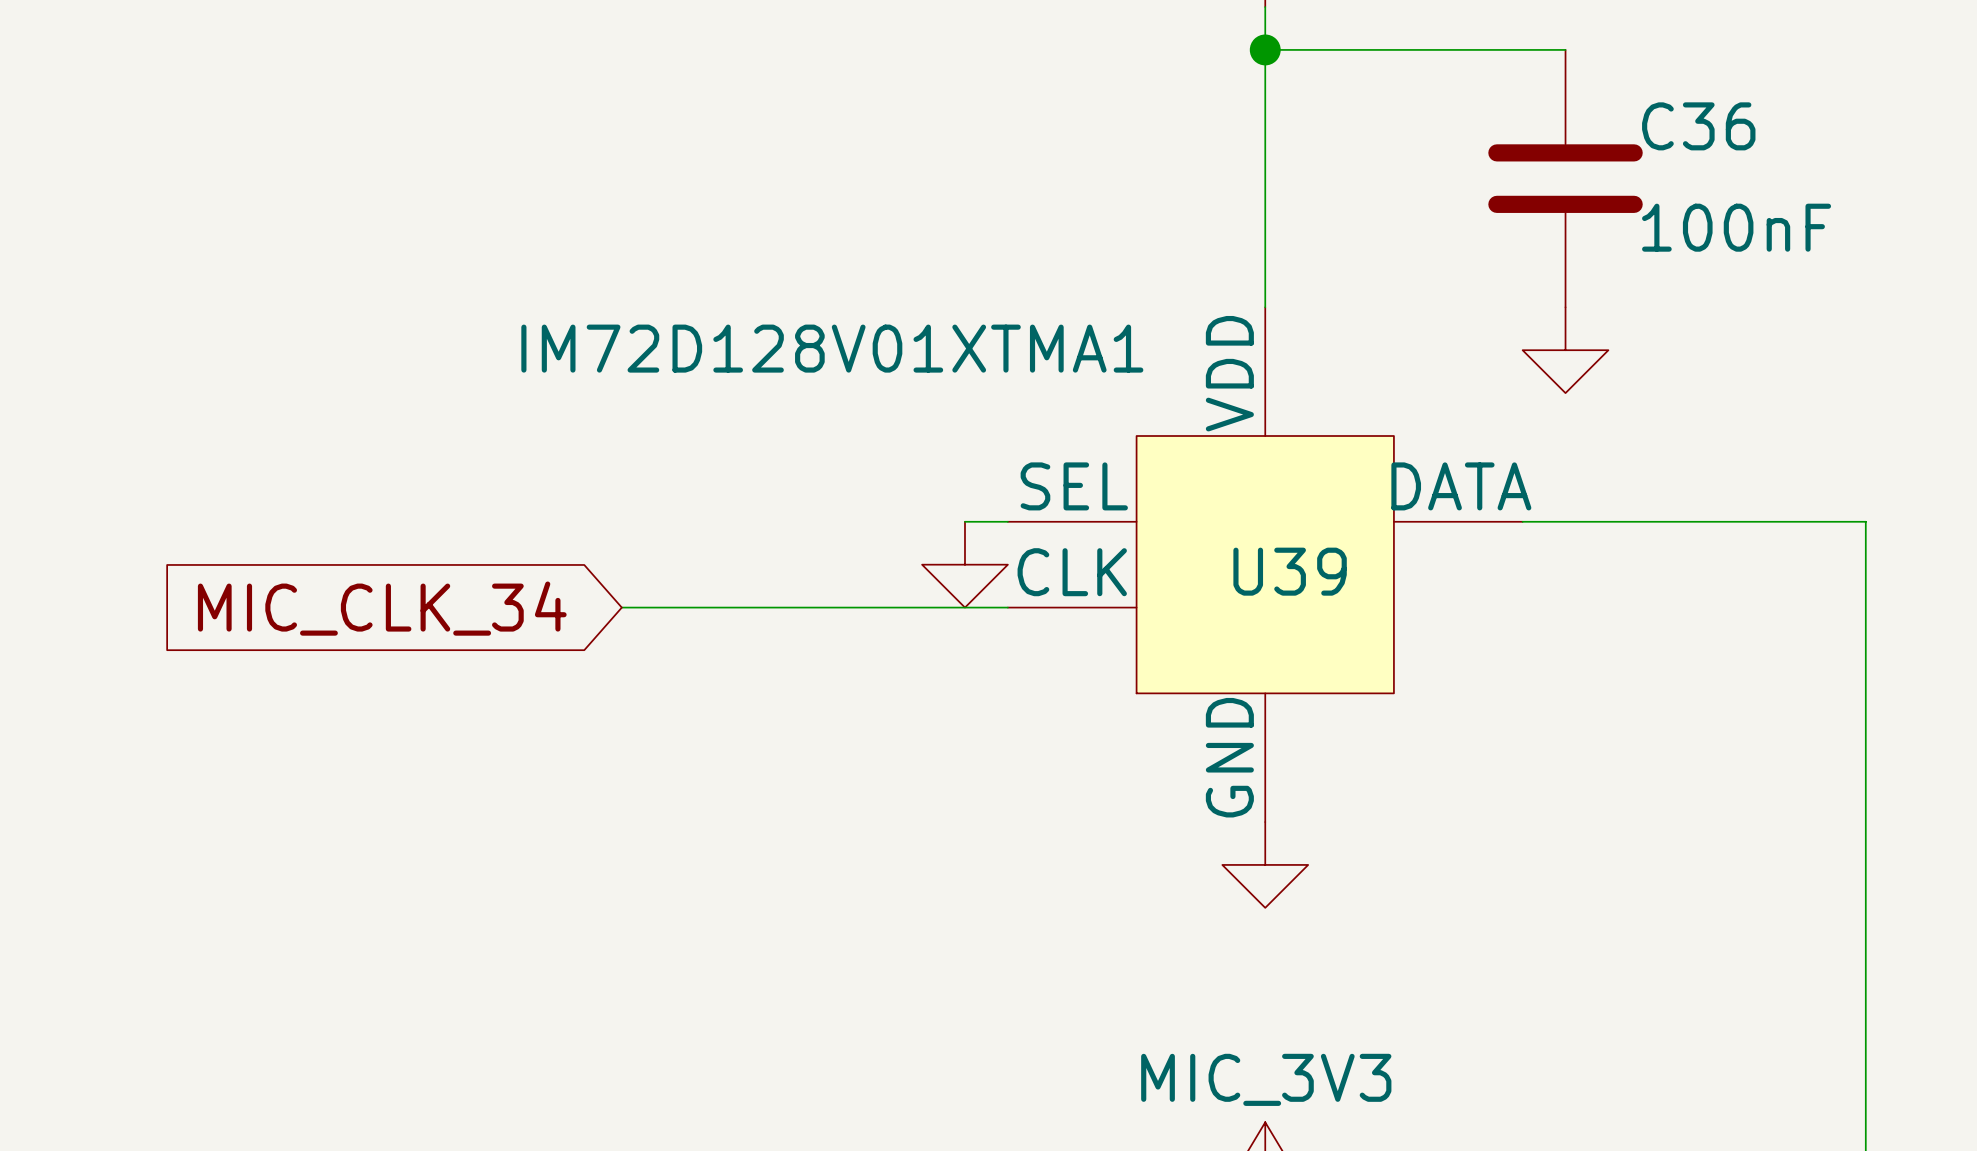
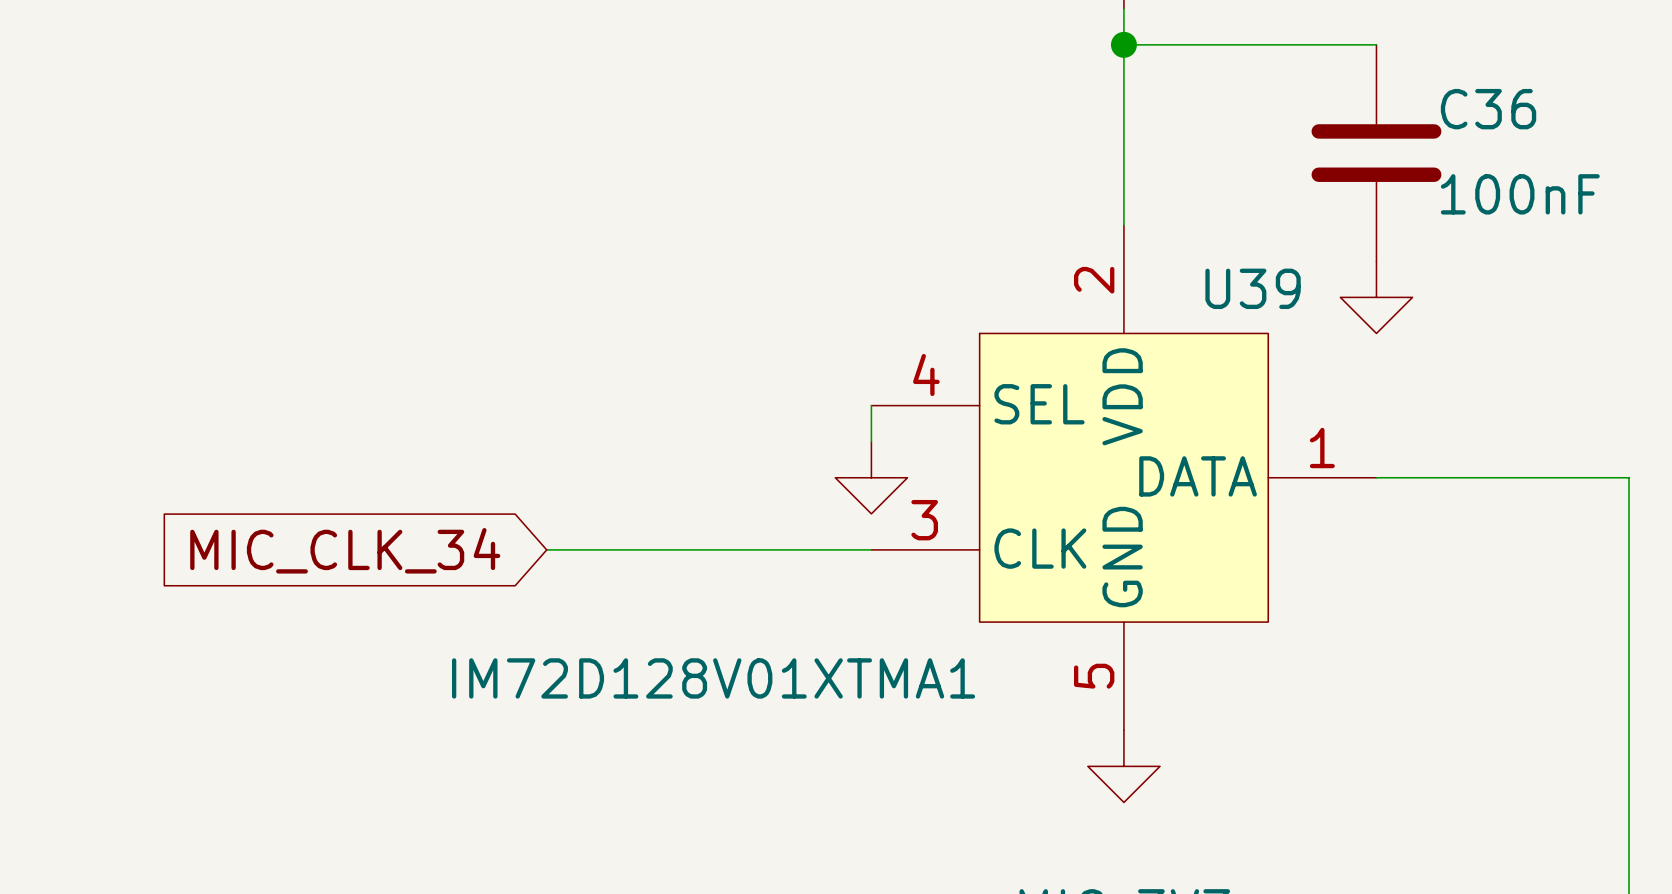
U39 symbol: [1007, 307, 1523, 823] -> [871, 225, 1377, 731]
U39 value position: IM72D128V01XTMA1 (832, 348) -> IM72D128V01XTMA1 (713, 678)
wire: (964, 521) (1007, 521) -> (871, 441) (871, 405)
wire: (1522, 521) (1865, 521) (1865, 564) -> (1376, 477) (1628, 477)
U39 name position: U39 (1290, 571) -> U39 (1253, 288)
wire: (621, 607) (1007, 607) -> (546, 549) (871, 549)
global label position: MIC_CLK_34 (382, 608) -> MIC_CLK_34 (345, 550)
power symbol position: (1265, 864) -> (1123, 766)

